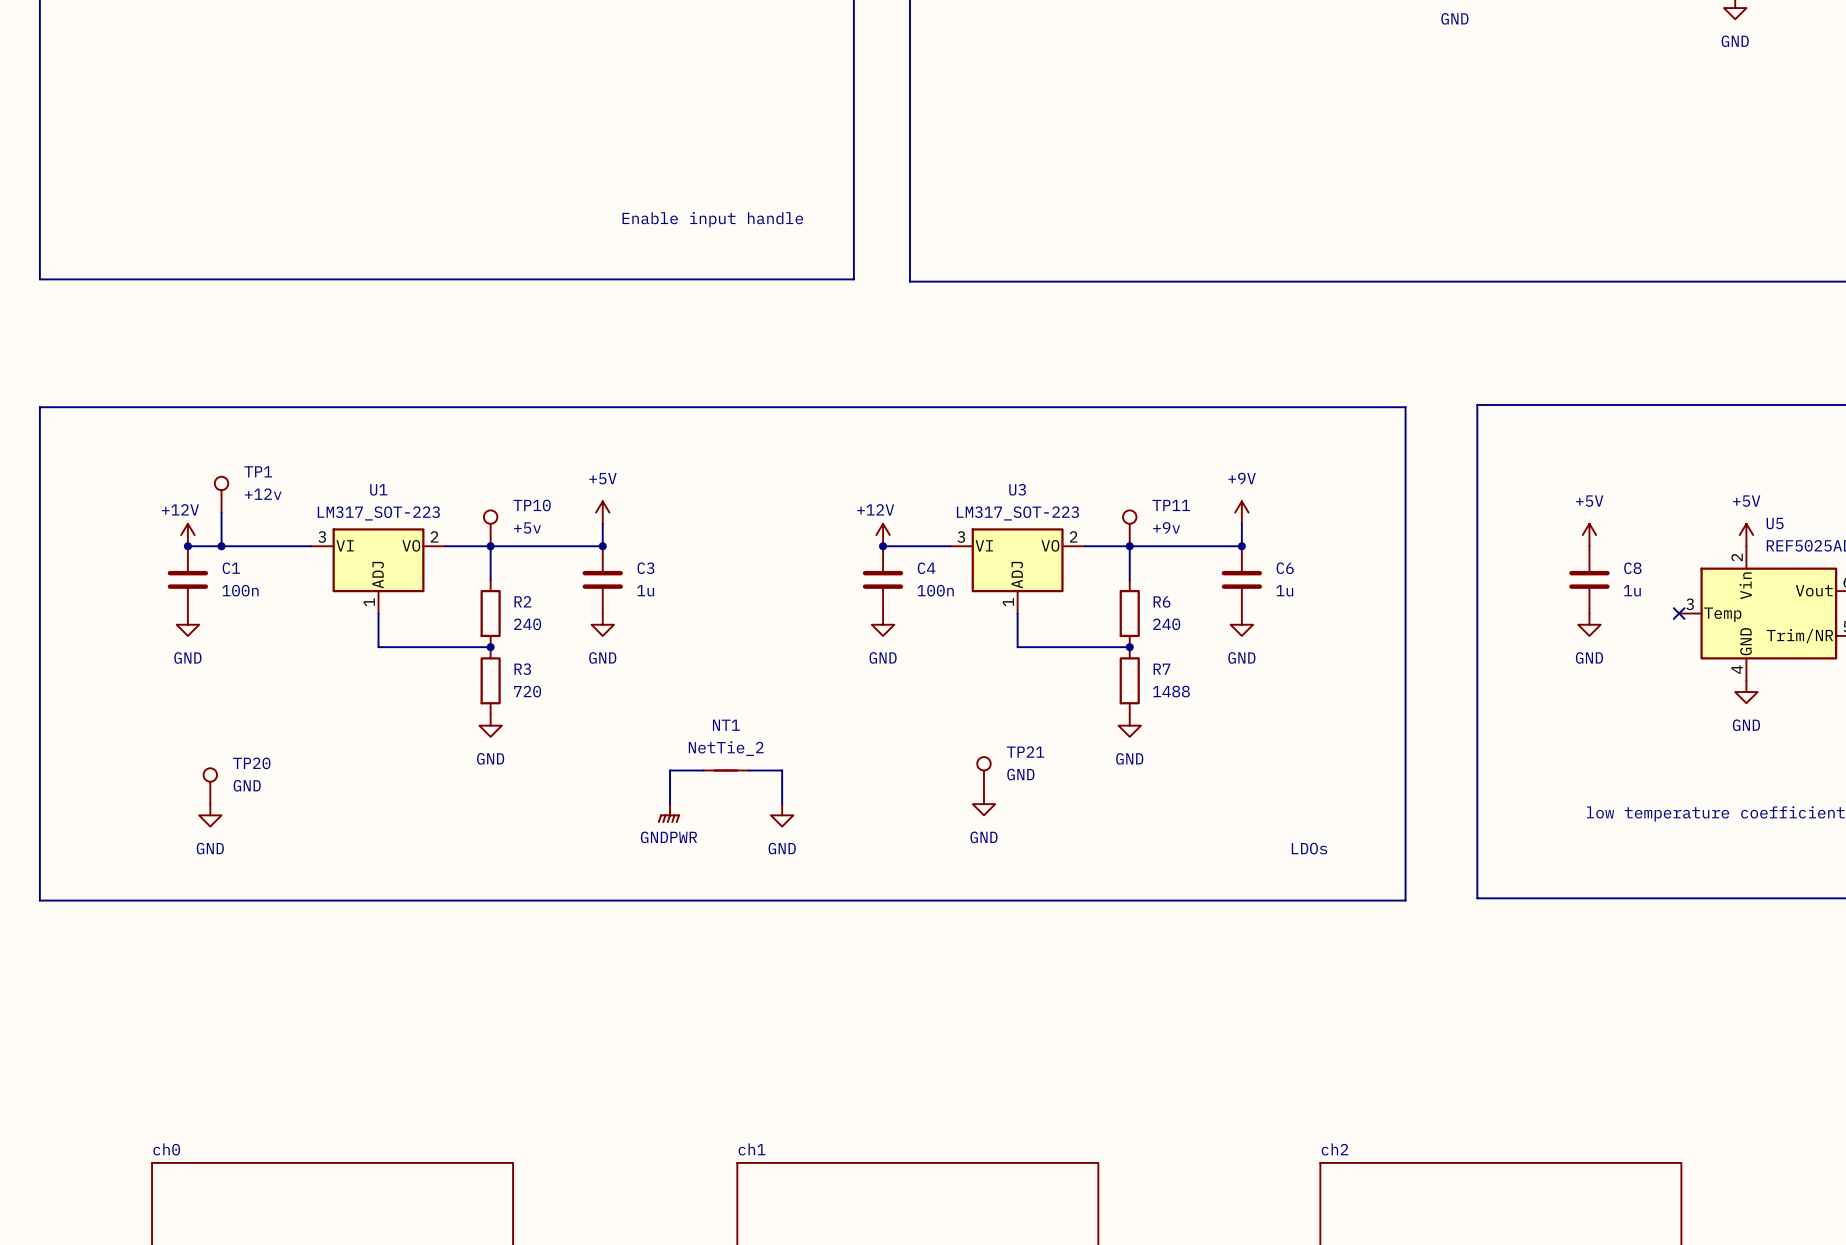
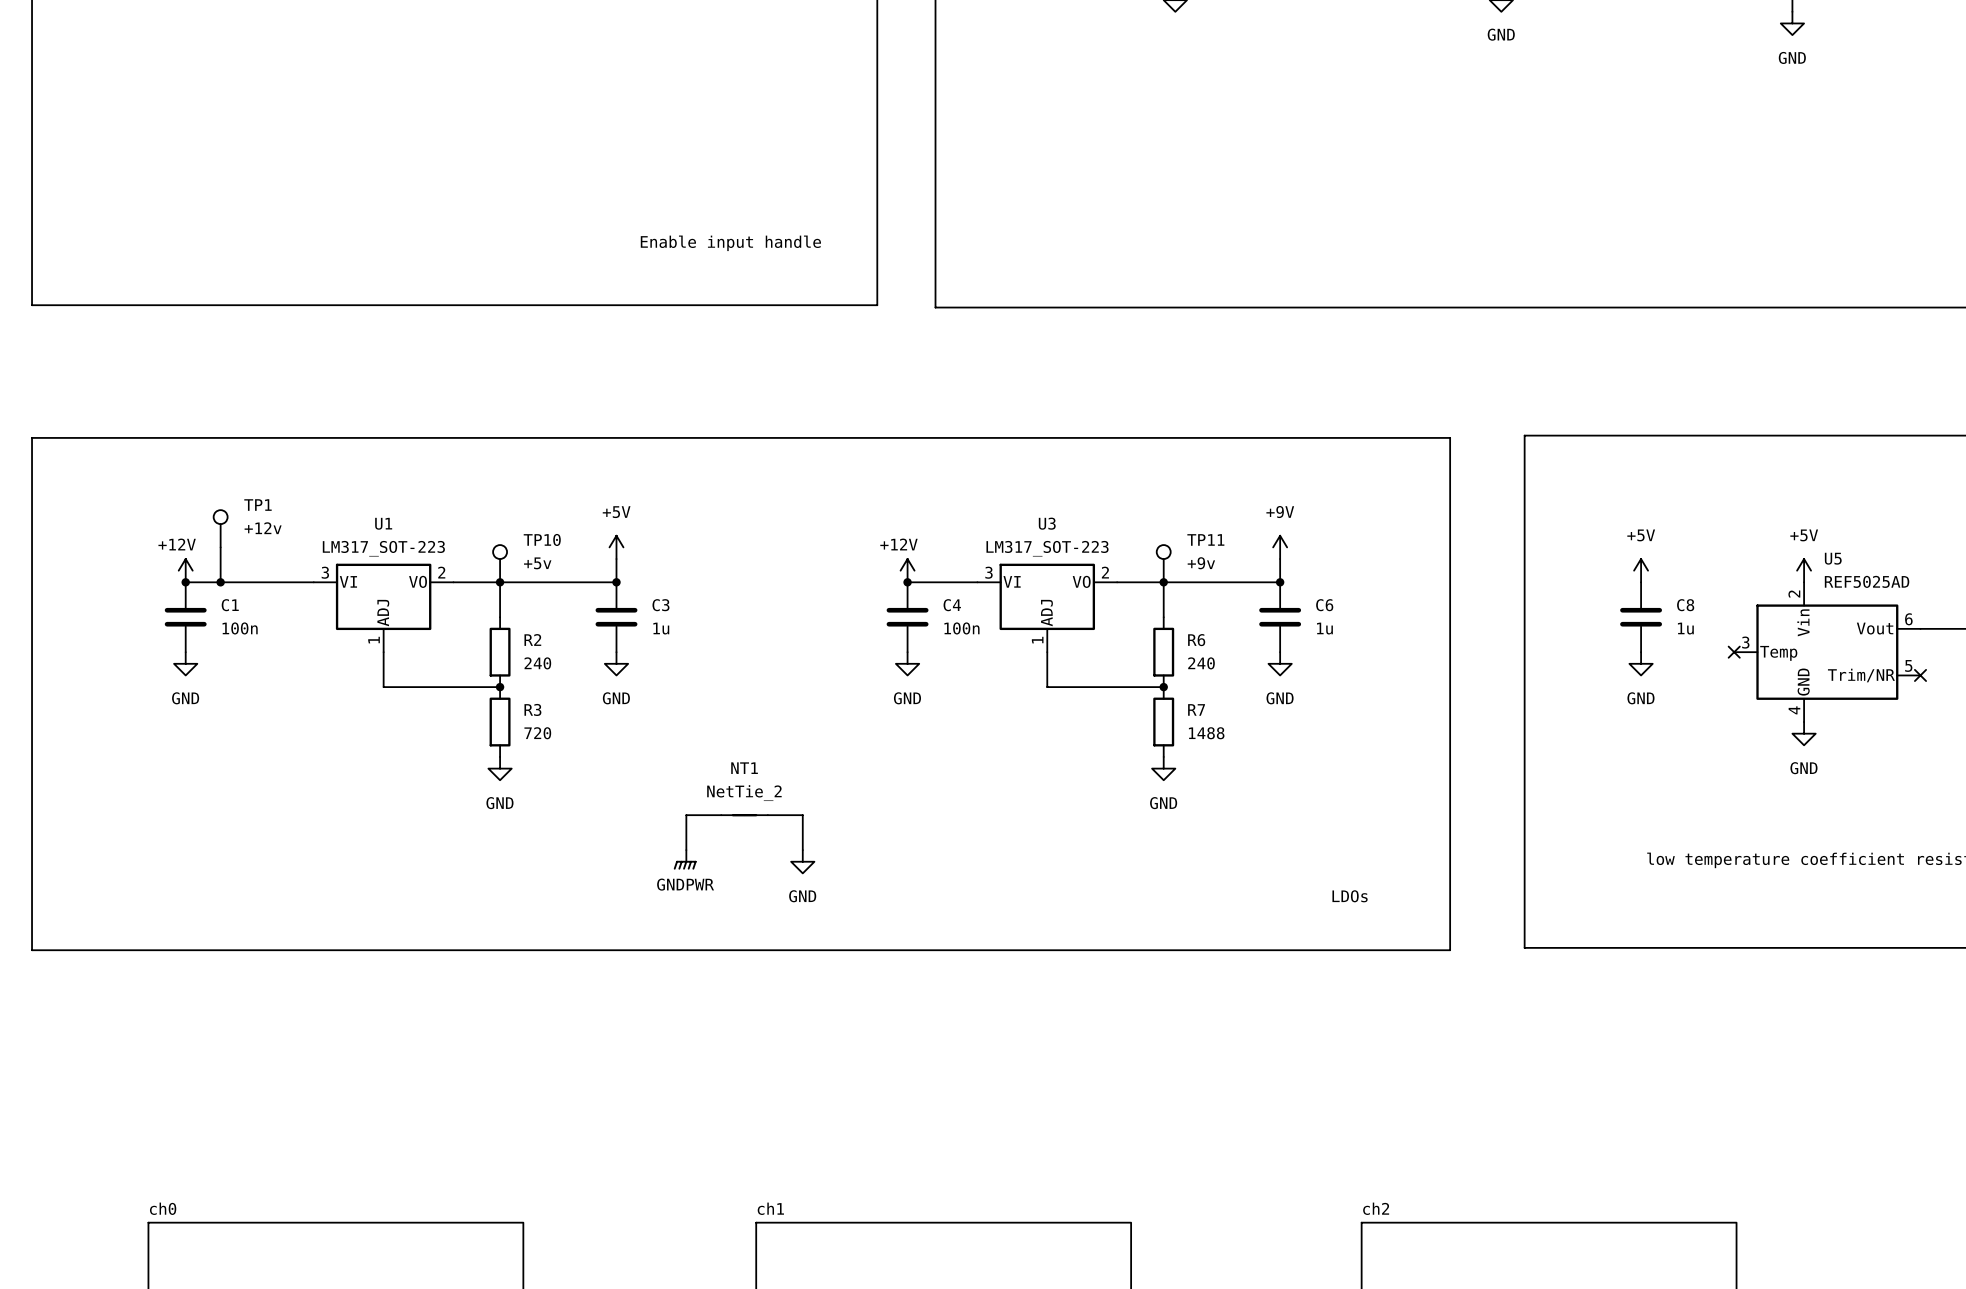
TP21: GND (983, 774) -> none
TP20: GND (210, 786) -> none
power symbol: GND (983, 804) -> none
power symbol: GND (210, 815) -> none

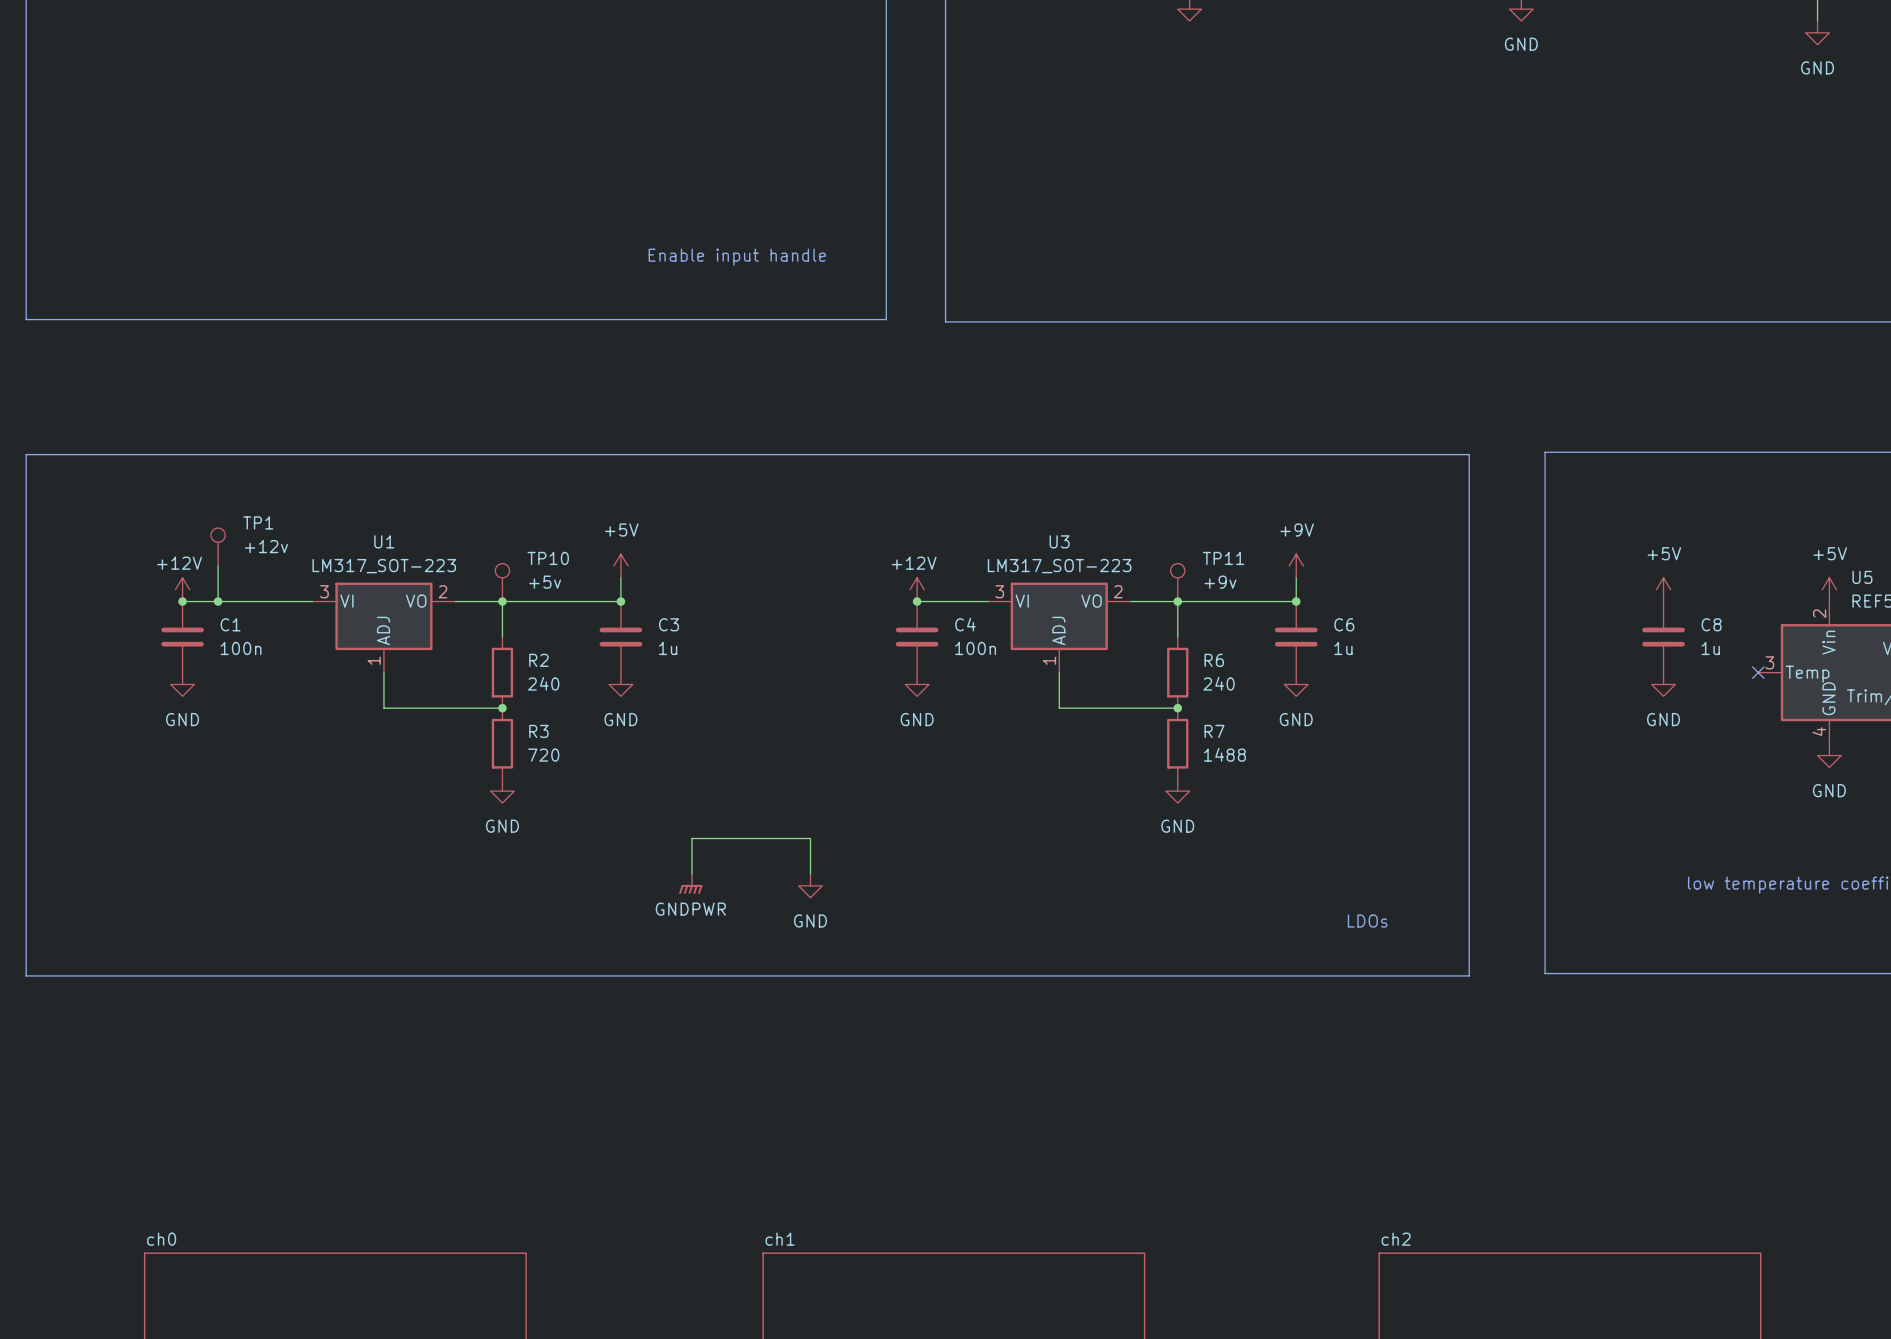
NT1: NetTie_2 (744, 815) -> none

